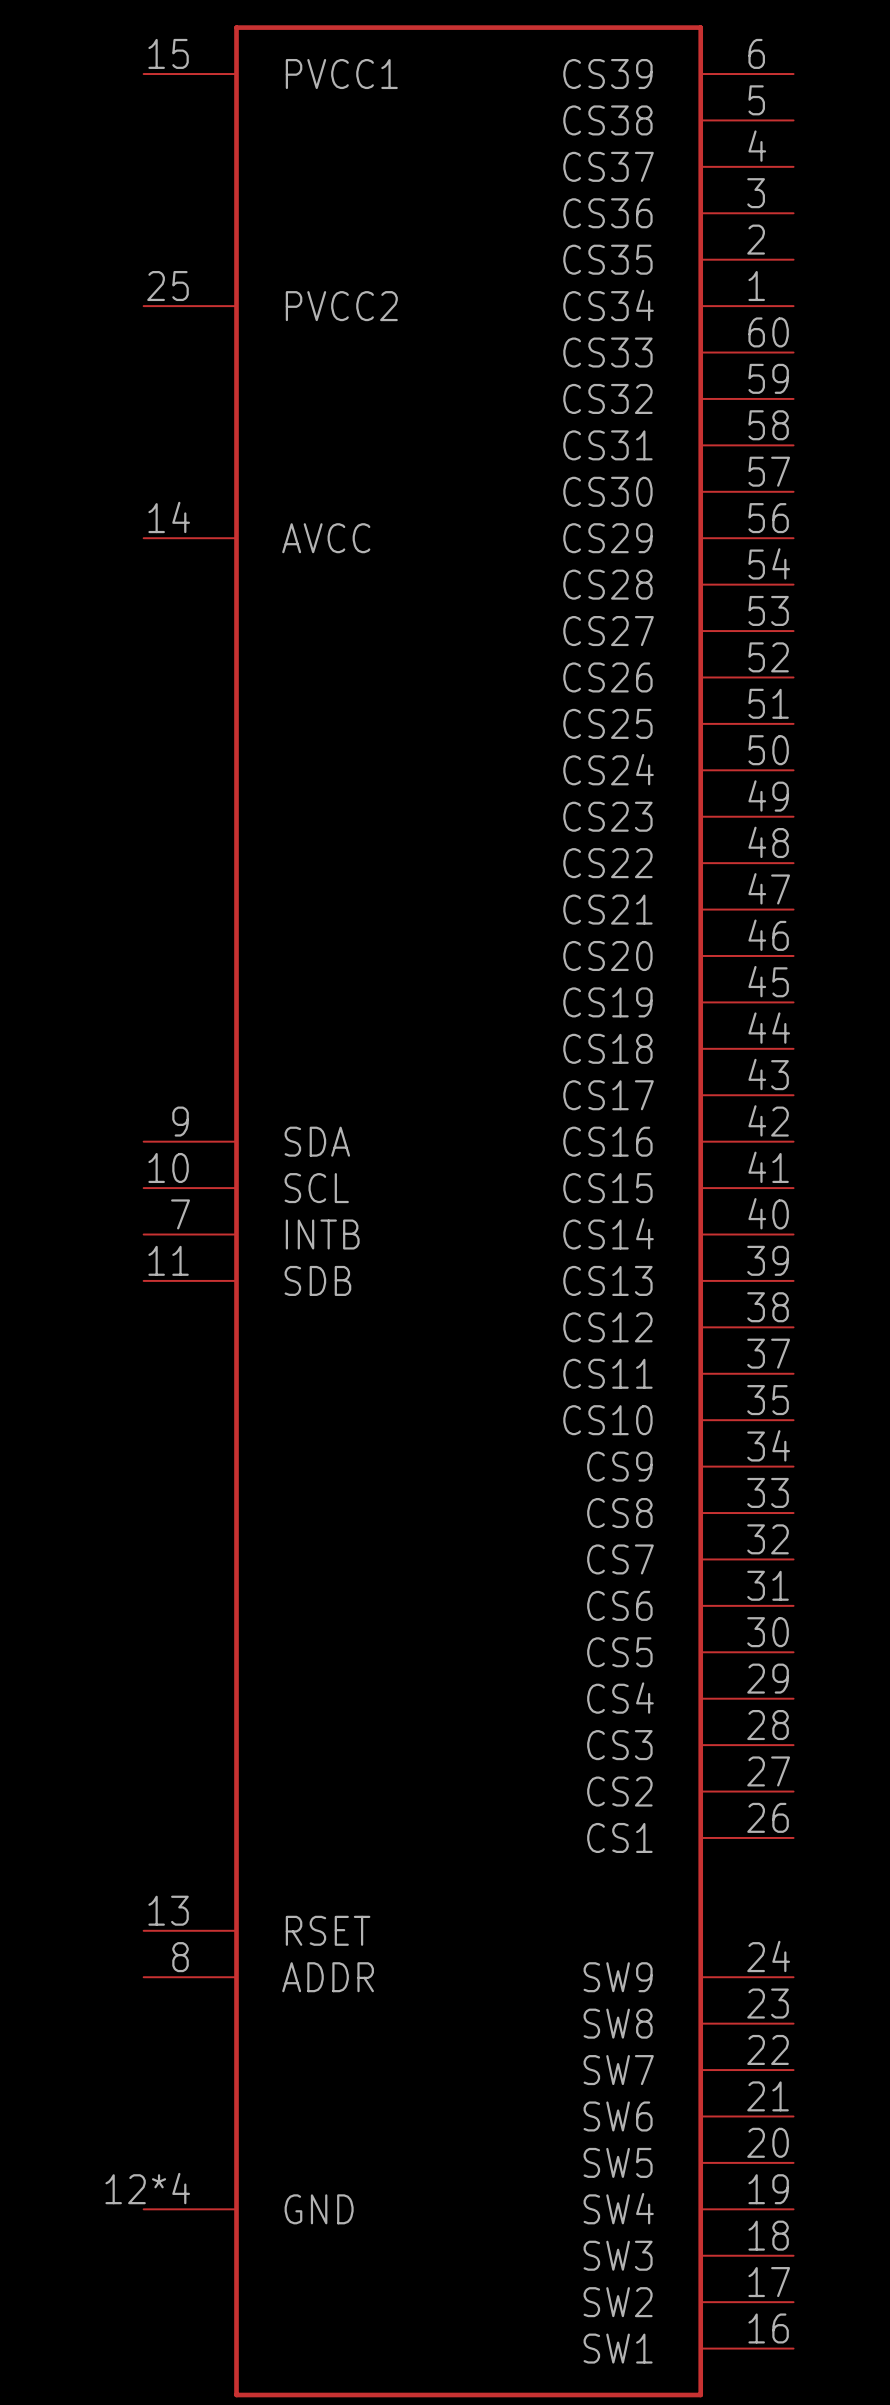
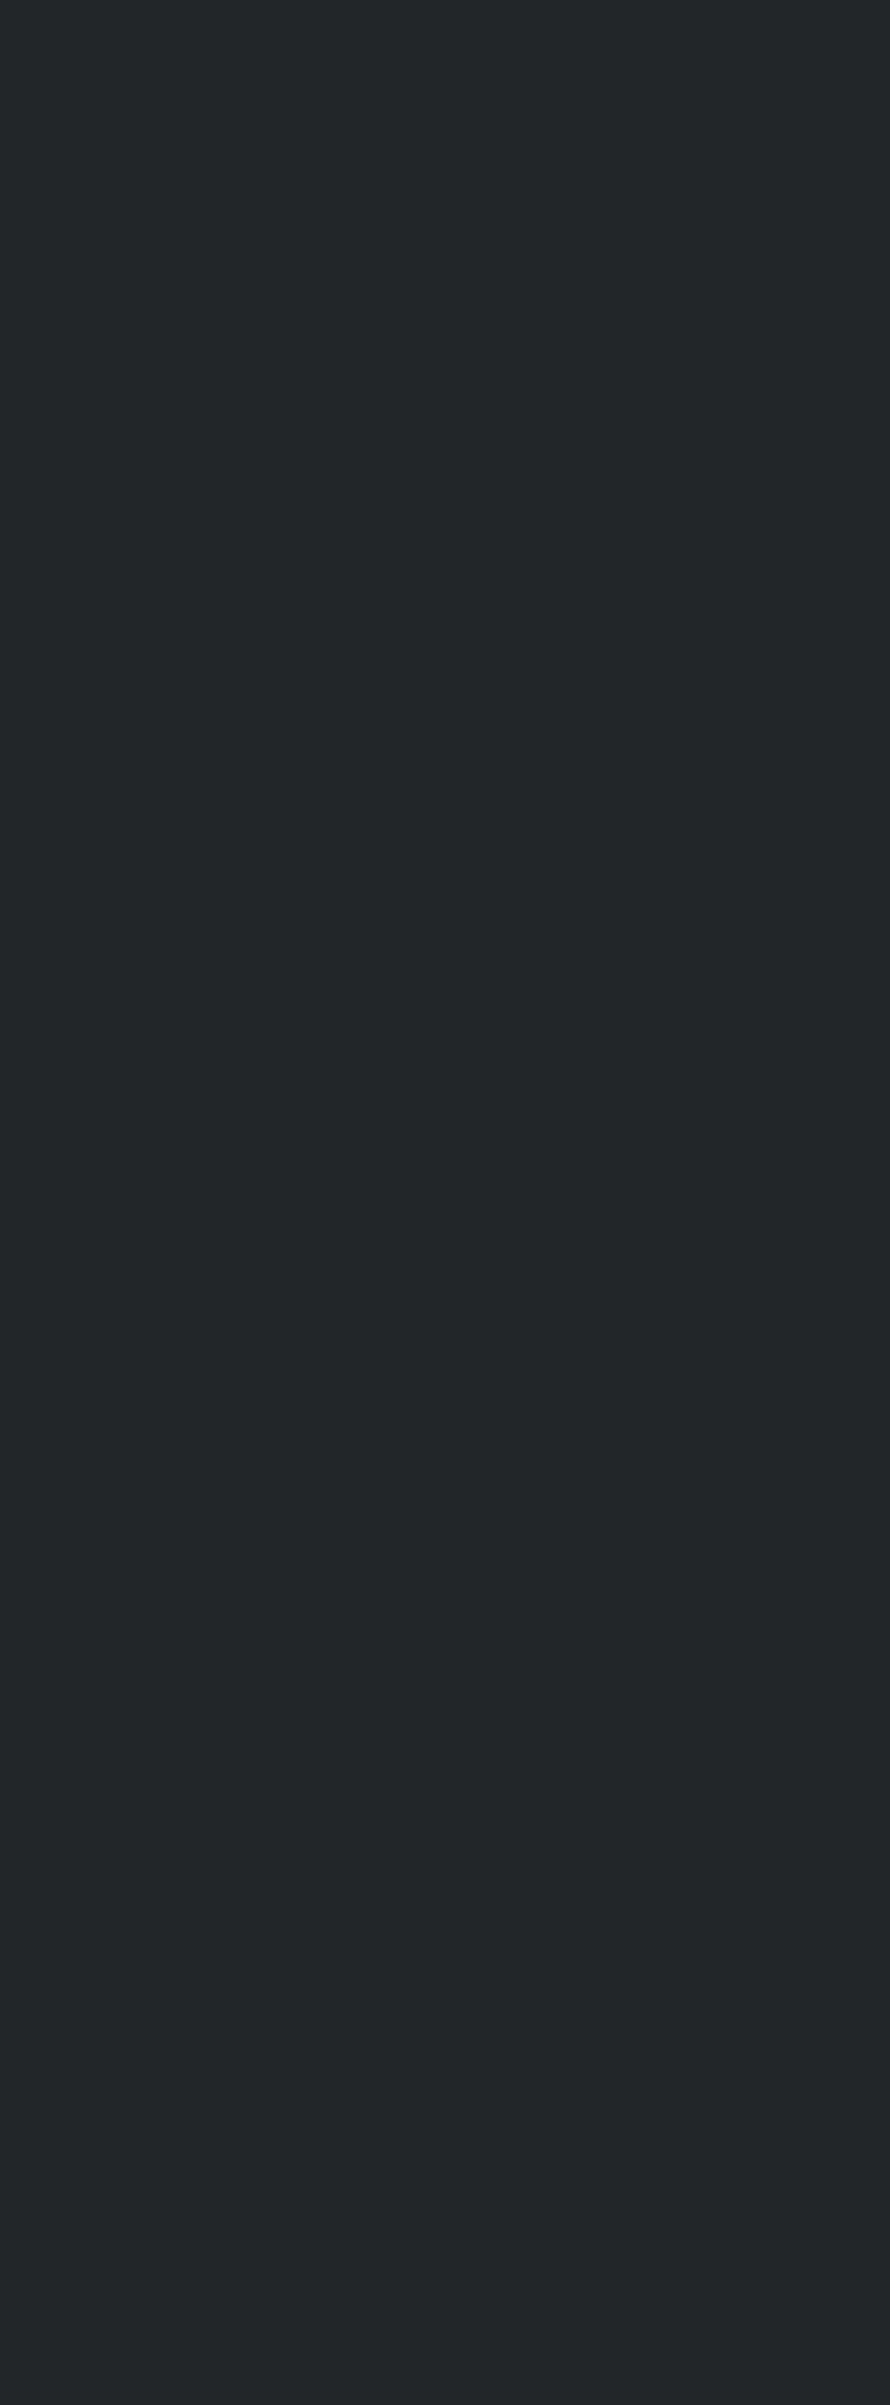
part: (468, 1211) -> none

